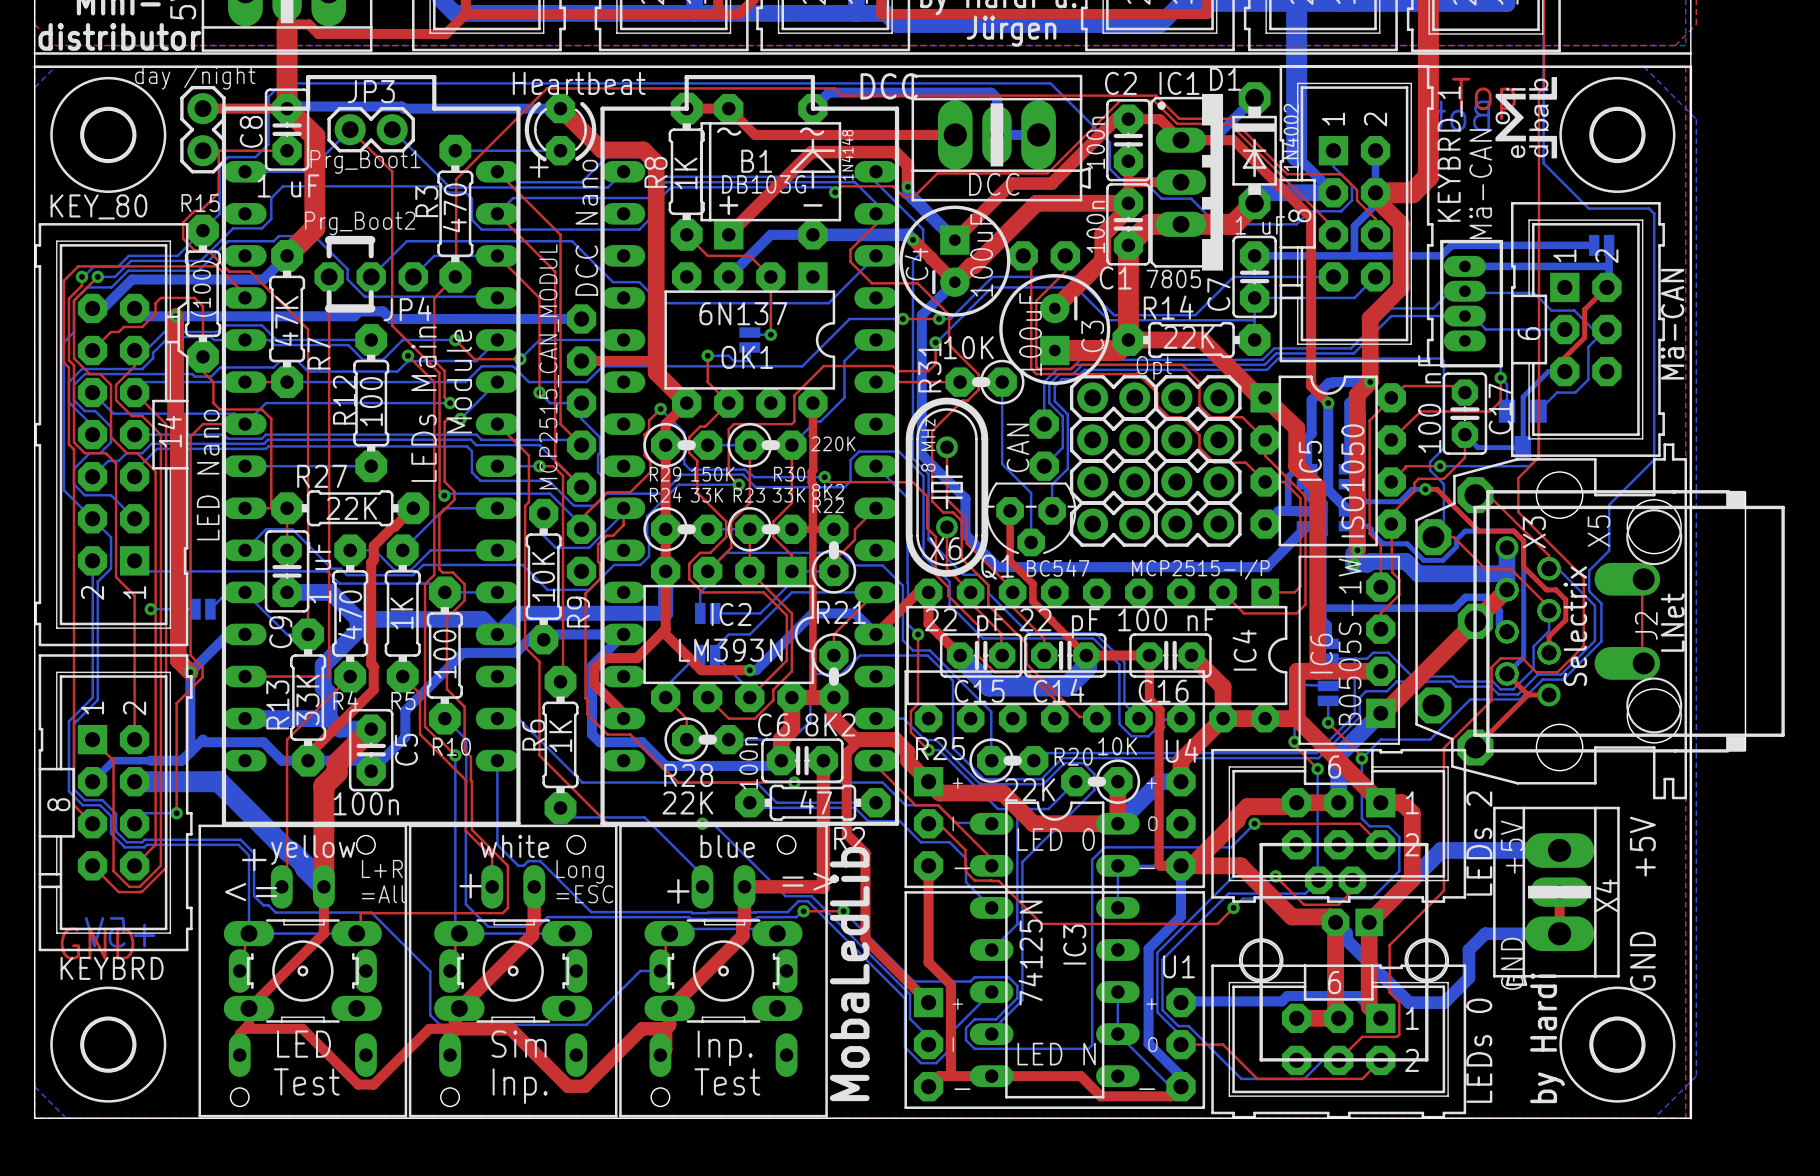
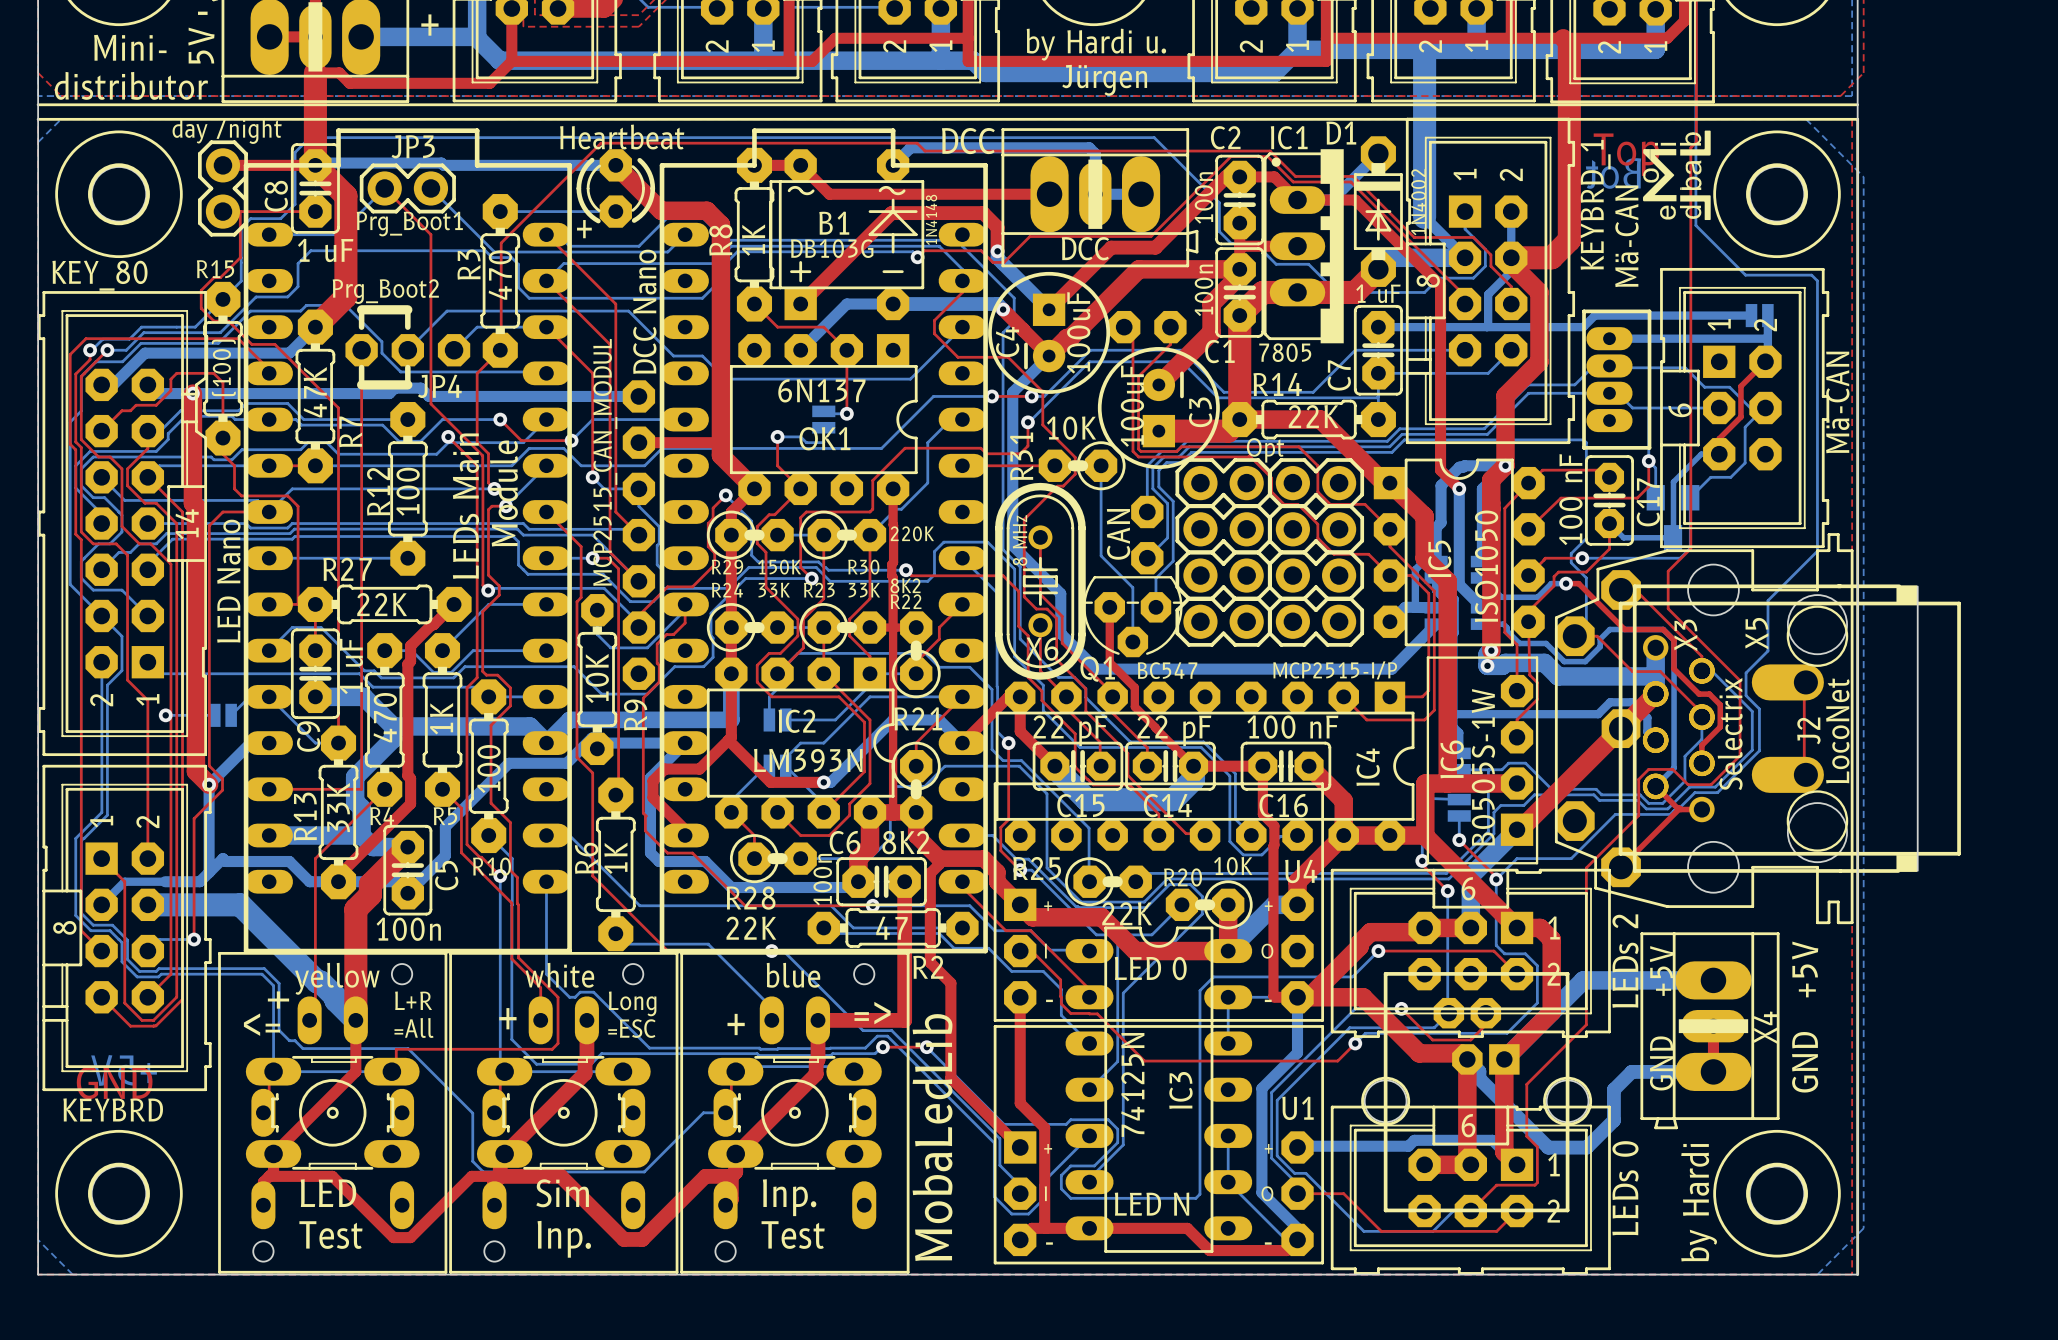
J2 value: LNet (1672, 622) -> LocoNet (1837, 730)

